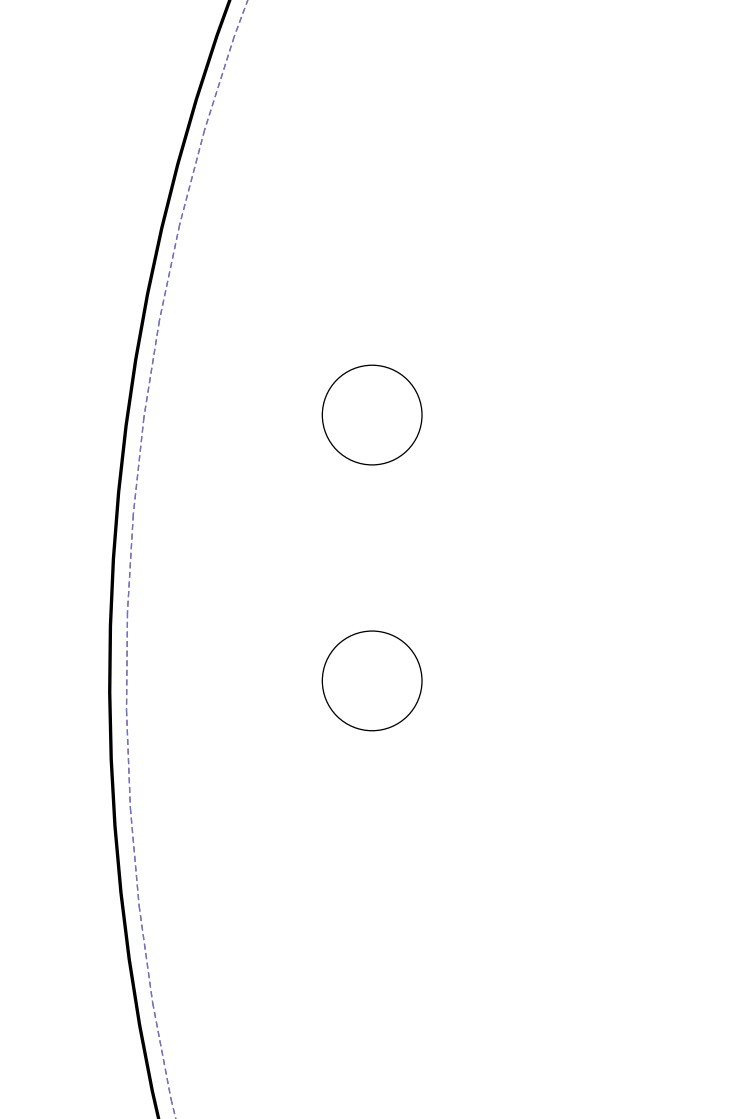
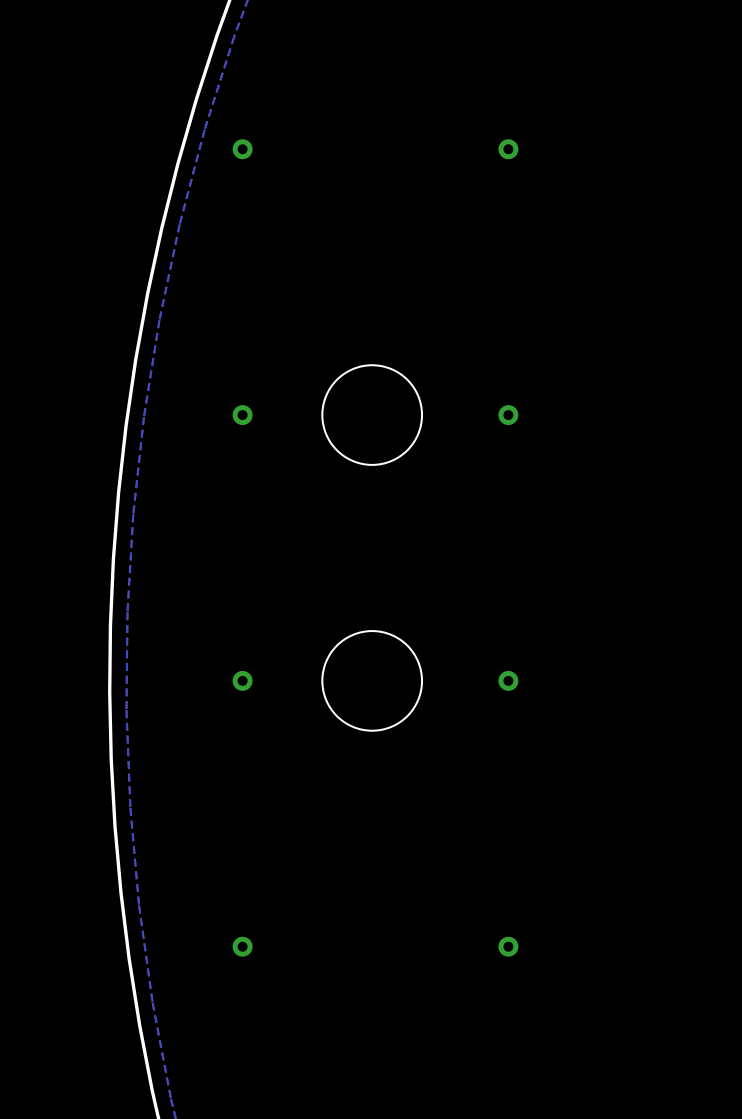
via: none -> (242, 149)
via: none -> (508, 149)
via: none -> (242, 415)
via: none -> (508, 415)
via: none -> (242, 680)
via: none -> (508, 680)
via: none -> (242, 946)
via: none -> (508, 946)

